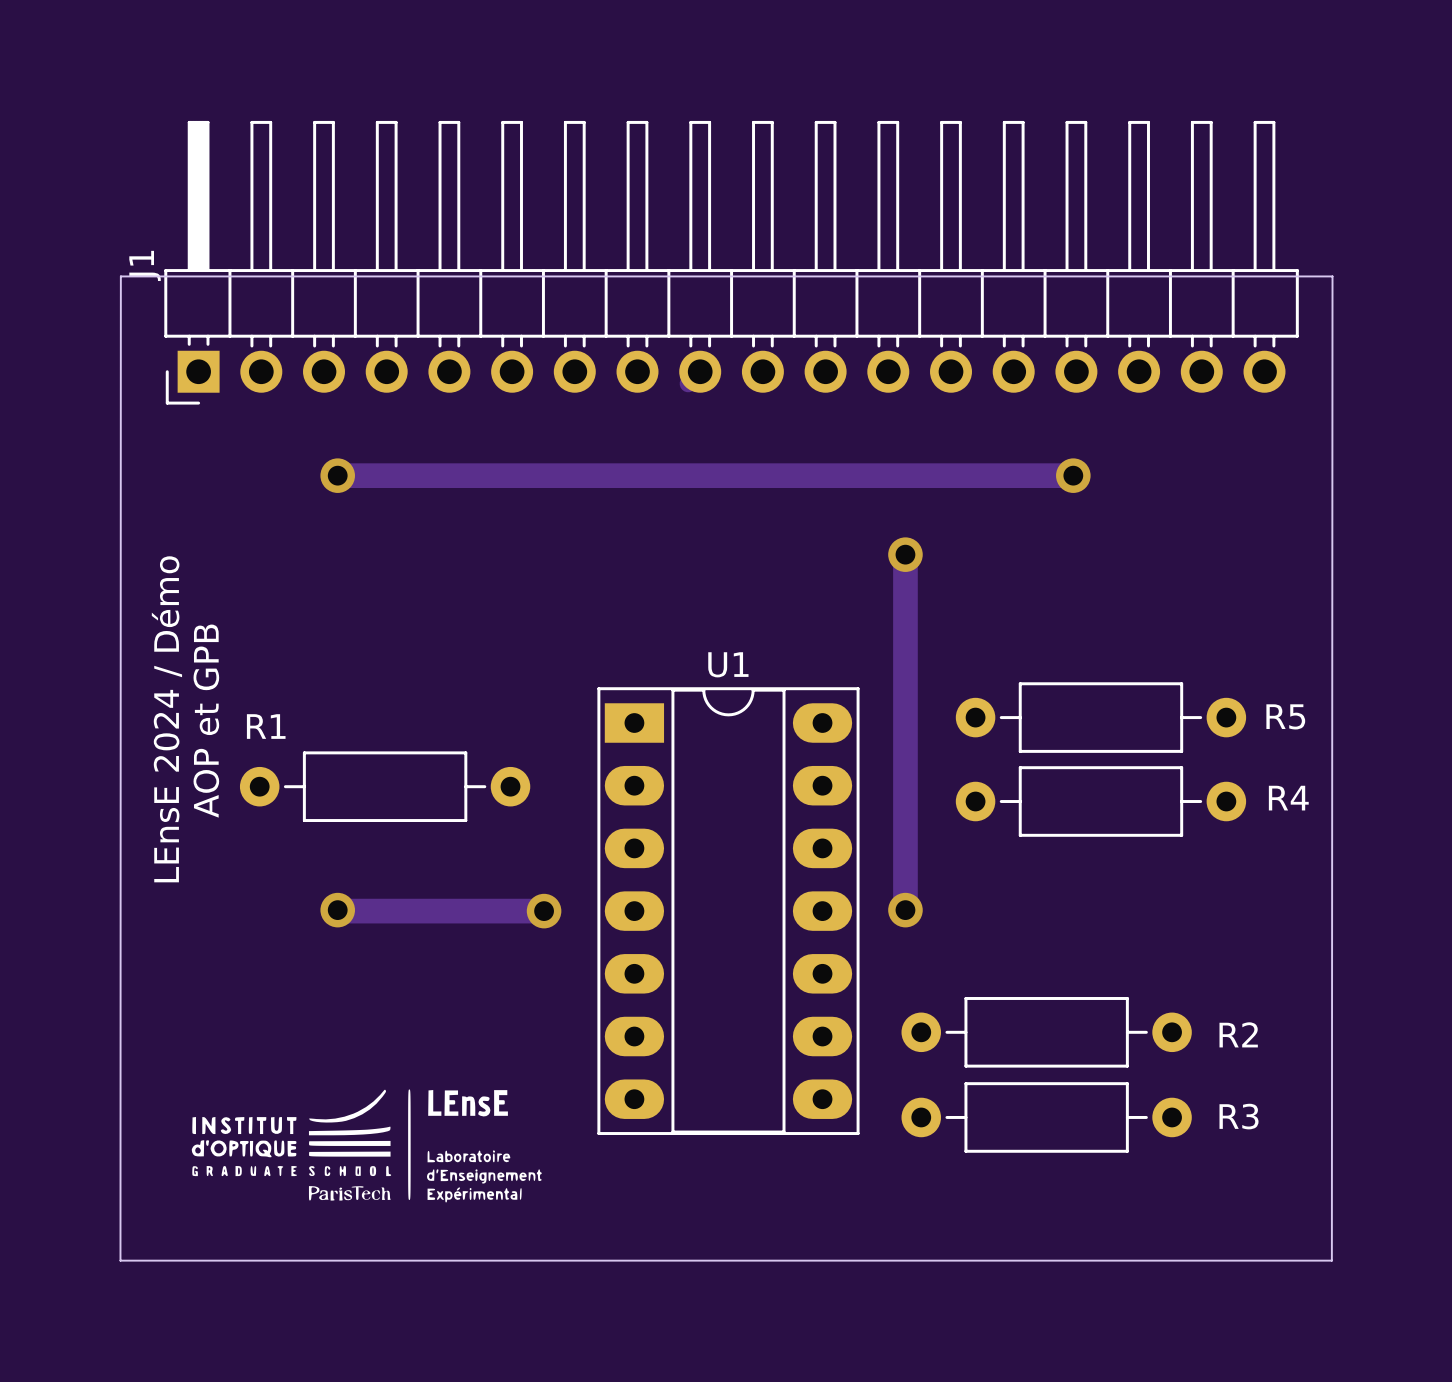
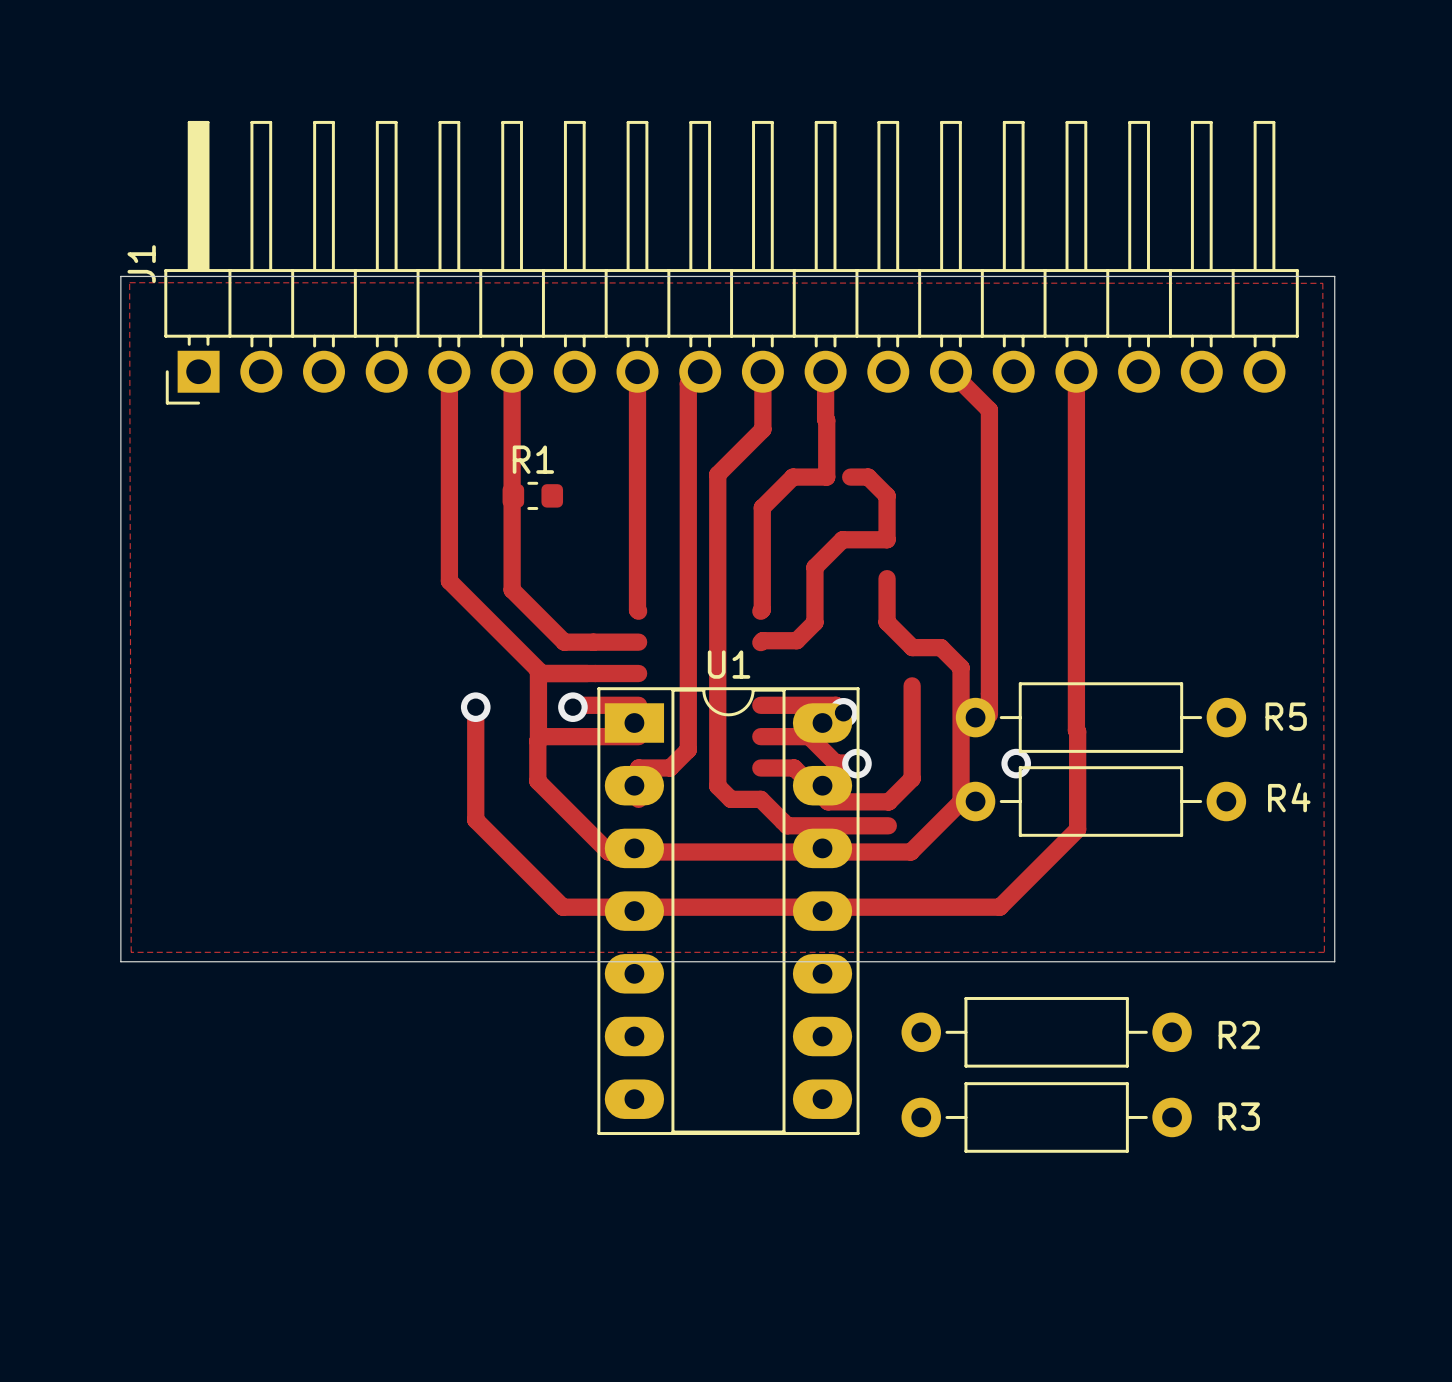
board edge: (120, 276) (120, 1260) (1331, 1260) (1332, 276) -> (120, 276) (120, 961) (1334, 961) (1334, 276) (1332, 276)
zone outline: none -> (129, 282) (131, 952) (1324, 952) (1322, 283) (129, 282)
track: none -> (449, 371) (449, 581) (541, 673)
track: none -> (512, 371) (512, 589) (564, 642) (638, 642)
track: none -> (637, 371) (638, 611)
track: none -> (762, 371) (762, 429) (717, 474) (717, 786) (730, 799) (760, 799) (787, 825) (888, 825)
track: none -> (825, 371) (826, 477) (793, 477) (762, 507) (760, 611)
track: none -> (951, 371) (989, 410) (989, 714)
track: none -> (1076, 371) (1077, 829) (999, 907) (562, 907) (475, 820) (475, 707)
track: none -> (688, 383) (688, 749) (670, 768) (638, 768) (638, 799)
track: (337, 475) (1073, 475) -> none
via: (337, 475) -> none
via: (1073, 475) -> none
track: none -> (850, 477) (868, 477) (887, 495) (887, 539) (842, 539) (814, 567) (814, 622) (796, 640) (762, 640) (760, 642)
track: (905, 554) (905, 910) -> none
via: (905, 554) -> none
track: none -> (887, 578) (887, 622) (912, 647) (940, 647) (961, 667) (961, 801) (910, 852) (608, 852) (537, 781) (537, 741) (542, 736) (638, 736)
track: none -> (638, 673) (538, 673) (538, 740)
track: none -> (912, 685) (912, 778) (888, 801) (828, 801) (794, 768) (760, 768)
track: none -> (638, 705) (574, 705) (572, 707)
track: none -> (760, 705) (836, 705) (843, 712)
via: none -> (475, 707)
via: none -> (572, 707)
via: none -> (843, 712)
text: LEnsE 2024 / Démo (166, 719) -> none
text: AOP et GPB (206, 721) -> none
R1 name position: R1 (266, 726) -> R1 (533, 459)
track: none -> (760, 736) (809, 736) (835, 762) (856, 763)
R1 footprint: [239, 751, 531, 822] -> [502, 481, 564, 510]
via: none -> (856, 763)
via: none -> (1016, 763)
track: (337, 910) (544, 911) -> none
via: (337, 910) -> none
via: (905, 910) -> none
via: (544, 911) -> none
drawing: [191, 1089, 542, 1203] -> none

